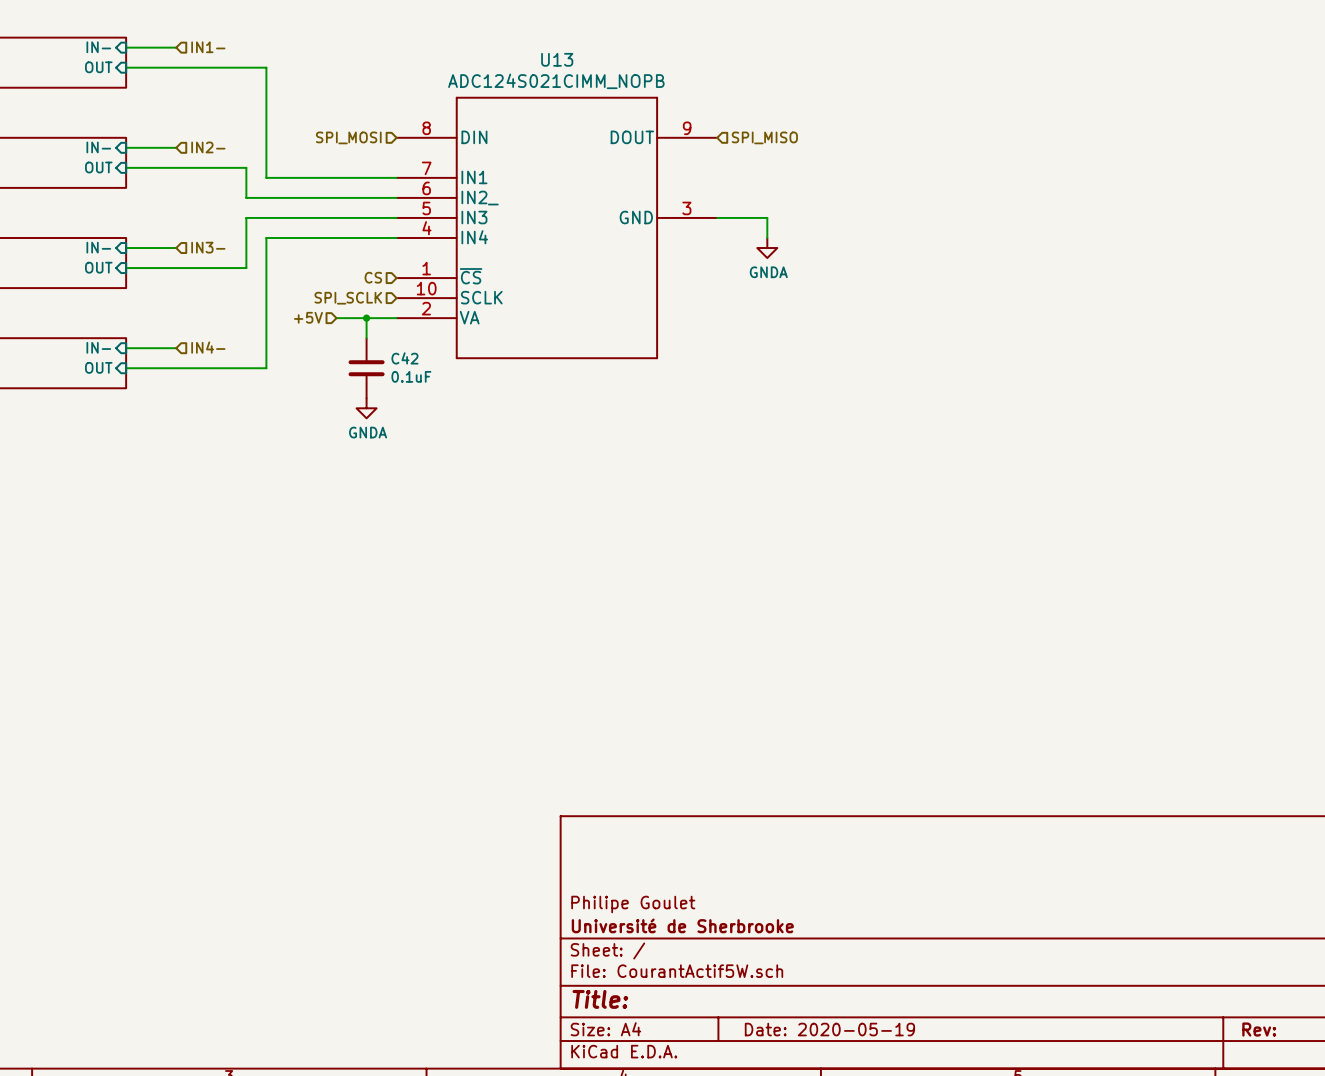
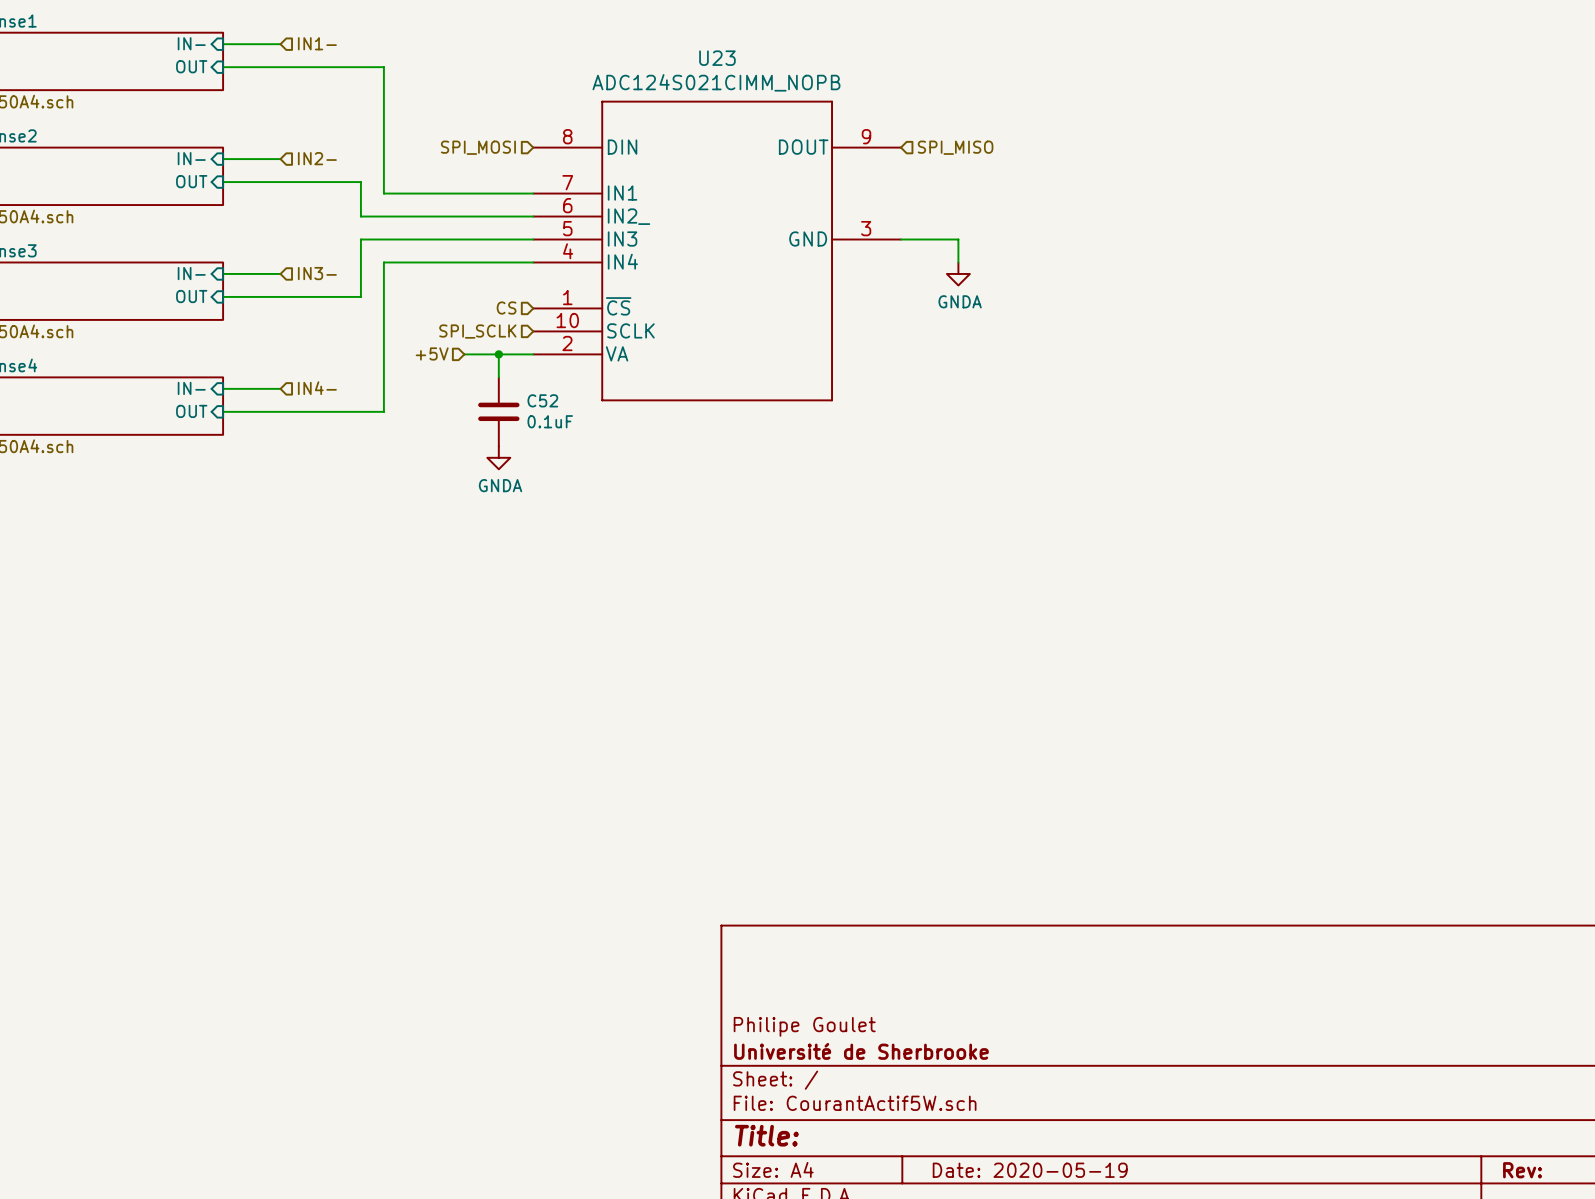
U13 name: U13 (557, 59) -> U23 (717, 58)
C42 name: C42 (404, 358) -> C52 (542, 400)

